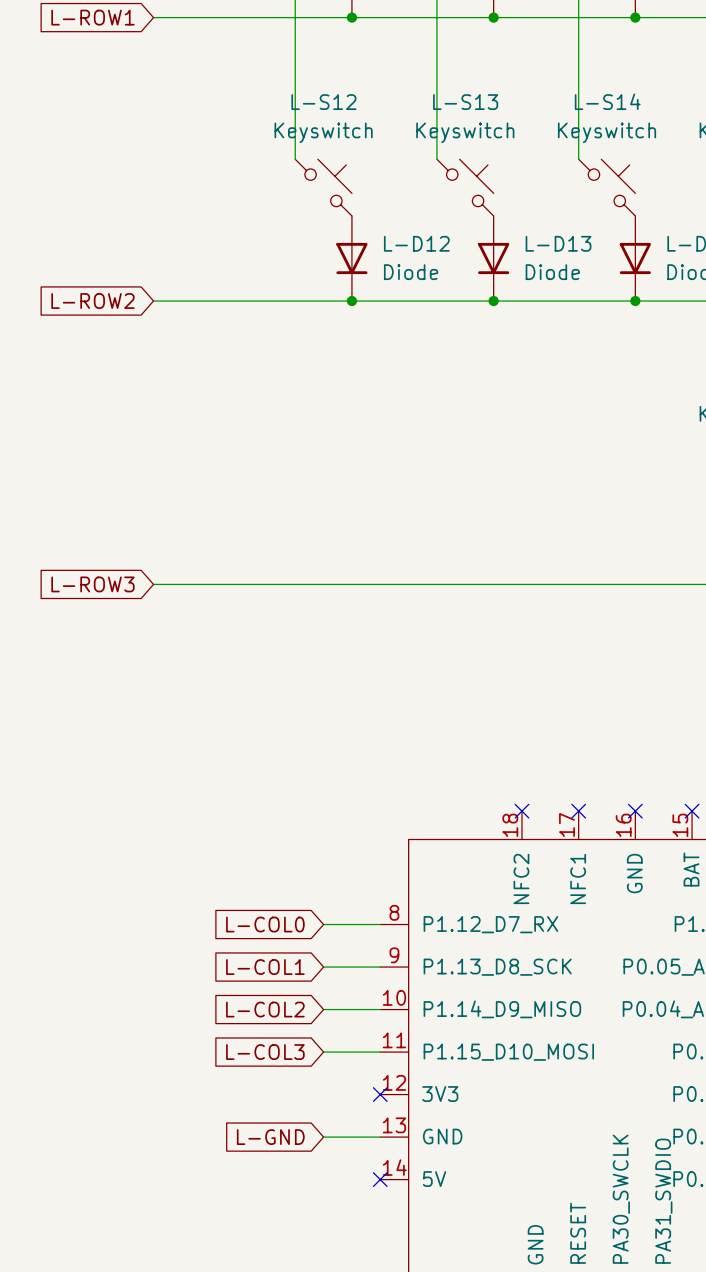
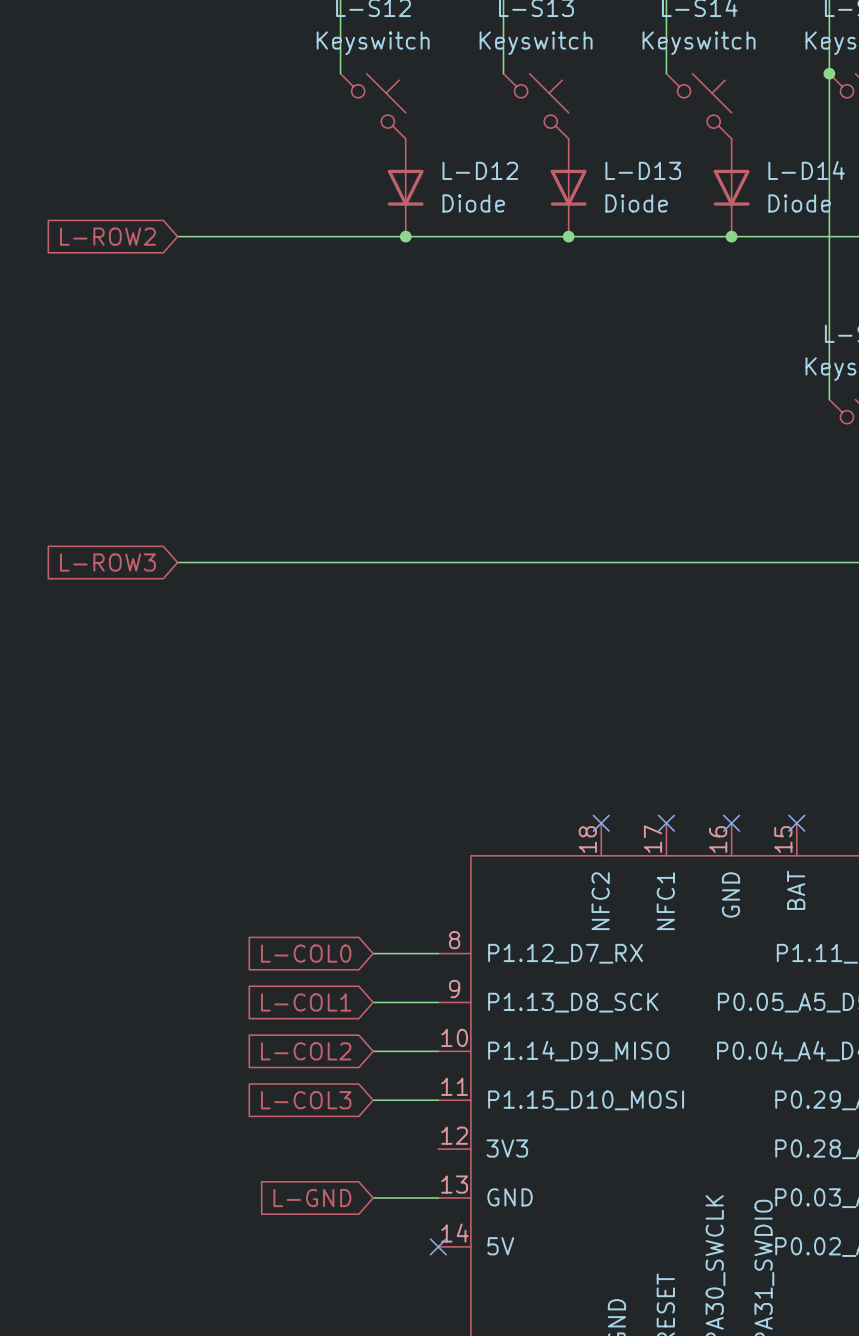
no-connect mark: (380, 1094) -> none

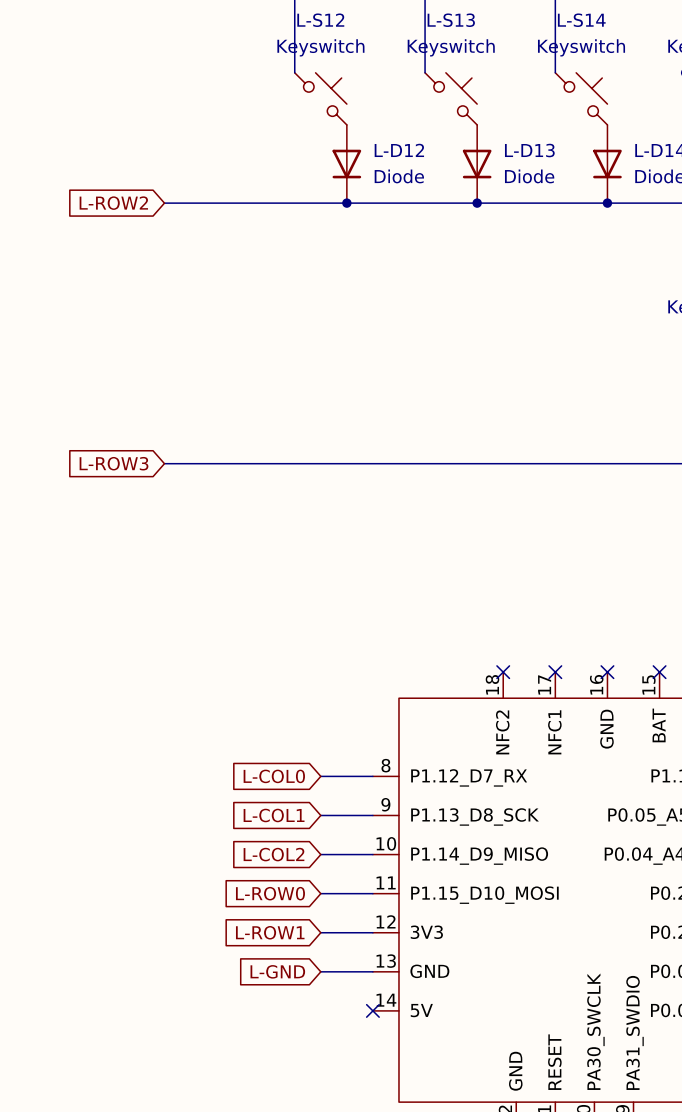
global label: L-COL3 (306, 1100) -> L-ROW0 (270, 893)
global label: none -> L-ROW1 (270, 932)
wire: none -> (320, 932) (372, 932)

